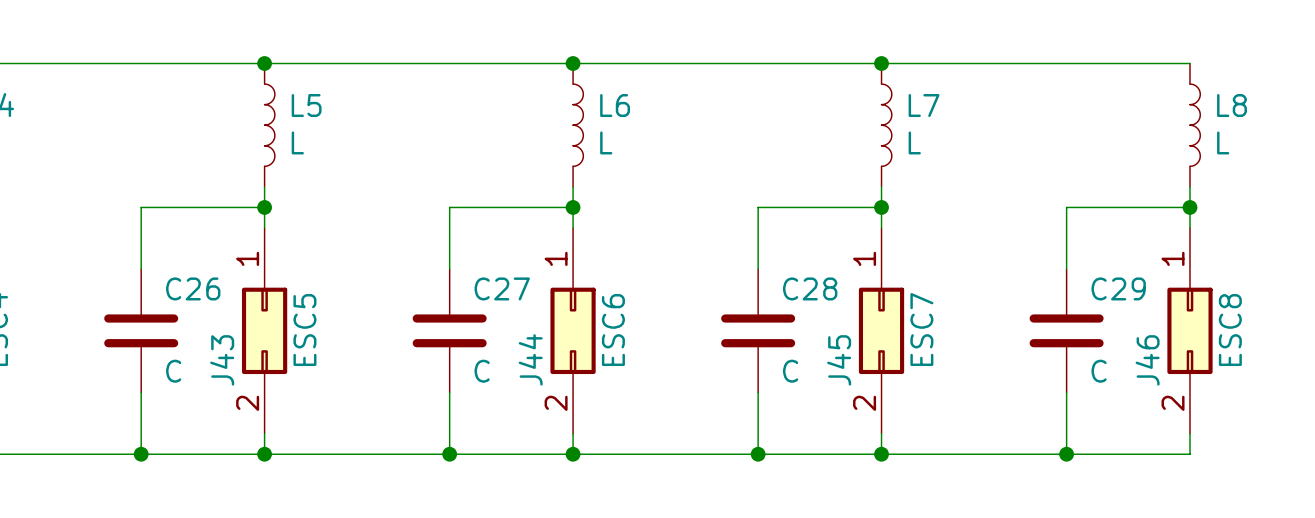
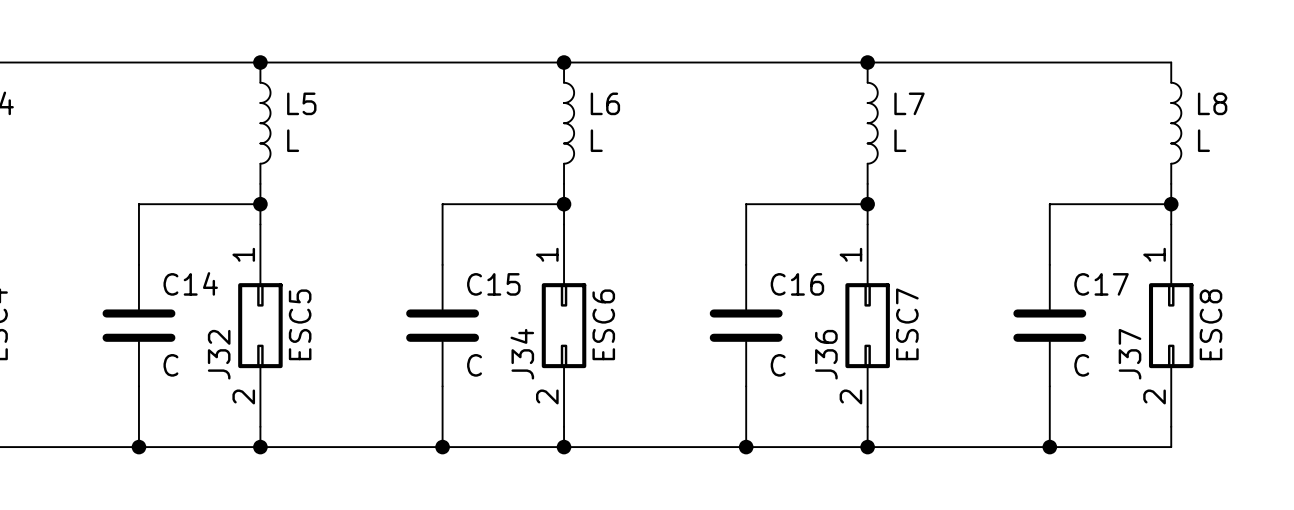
C26 name: C26 (193, 288) -> C14 (190, 283)
C27 name: C27 (502, 288) -> C15 (493, 284)
C28 name: C28 (810, 288) -> C16 (797, 284)
C29 name: C29 (1118, 288) -> C17 (1101, 284)
J44 name: J44 (530, 359) -> J34 (522, 354)
J43 name: J43 (222, 360) -> J32 (219, 354)
J45 name: J45 (839, 360) -> J36 (826, 354)
J46 name: J46 (1147, 360) -> J37 (1130, 354)

